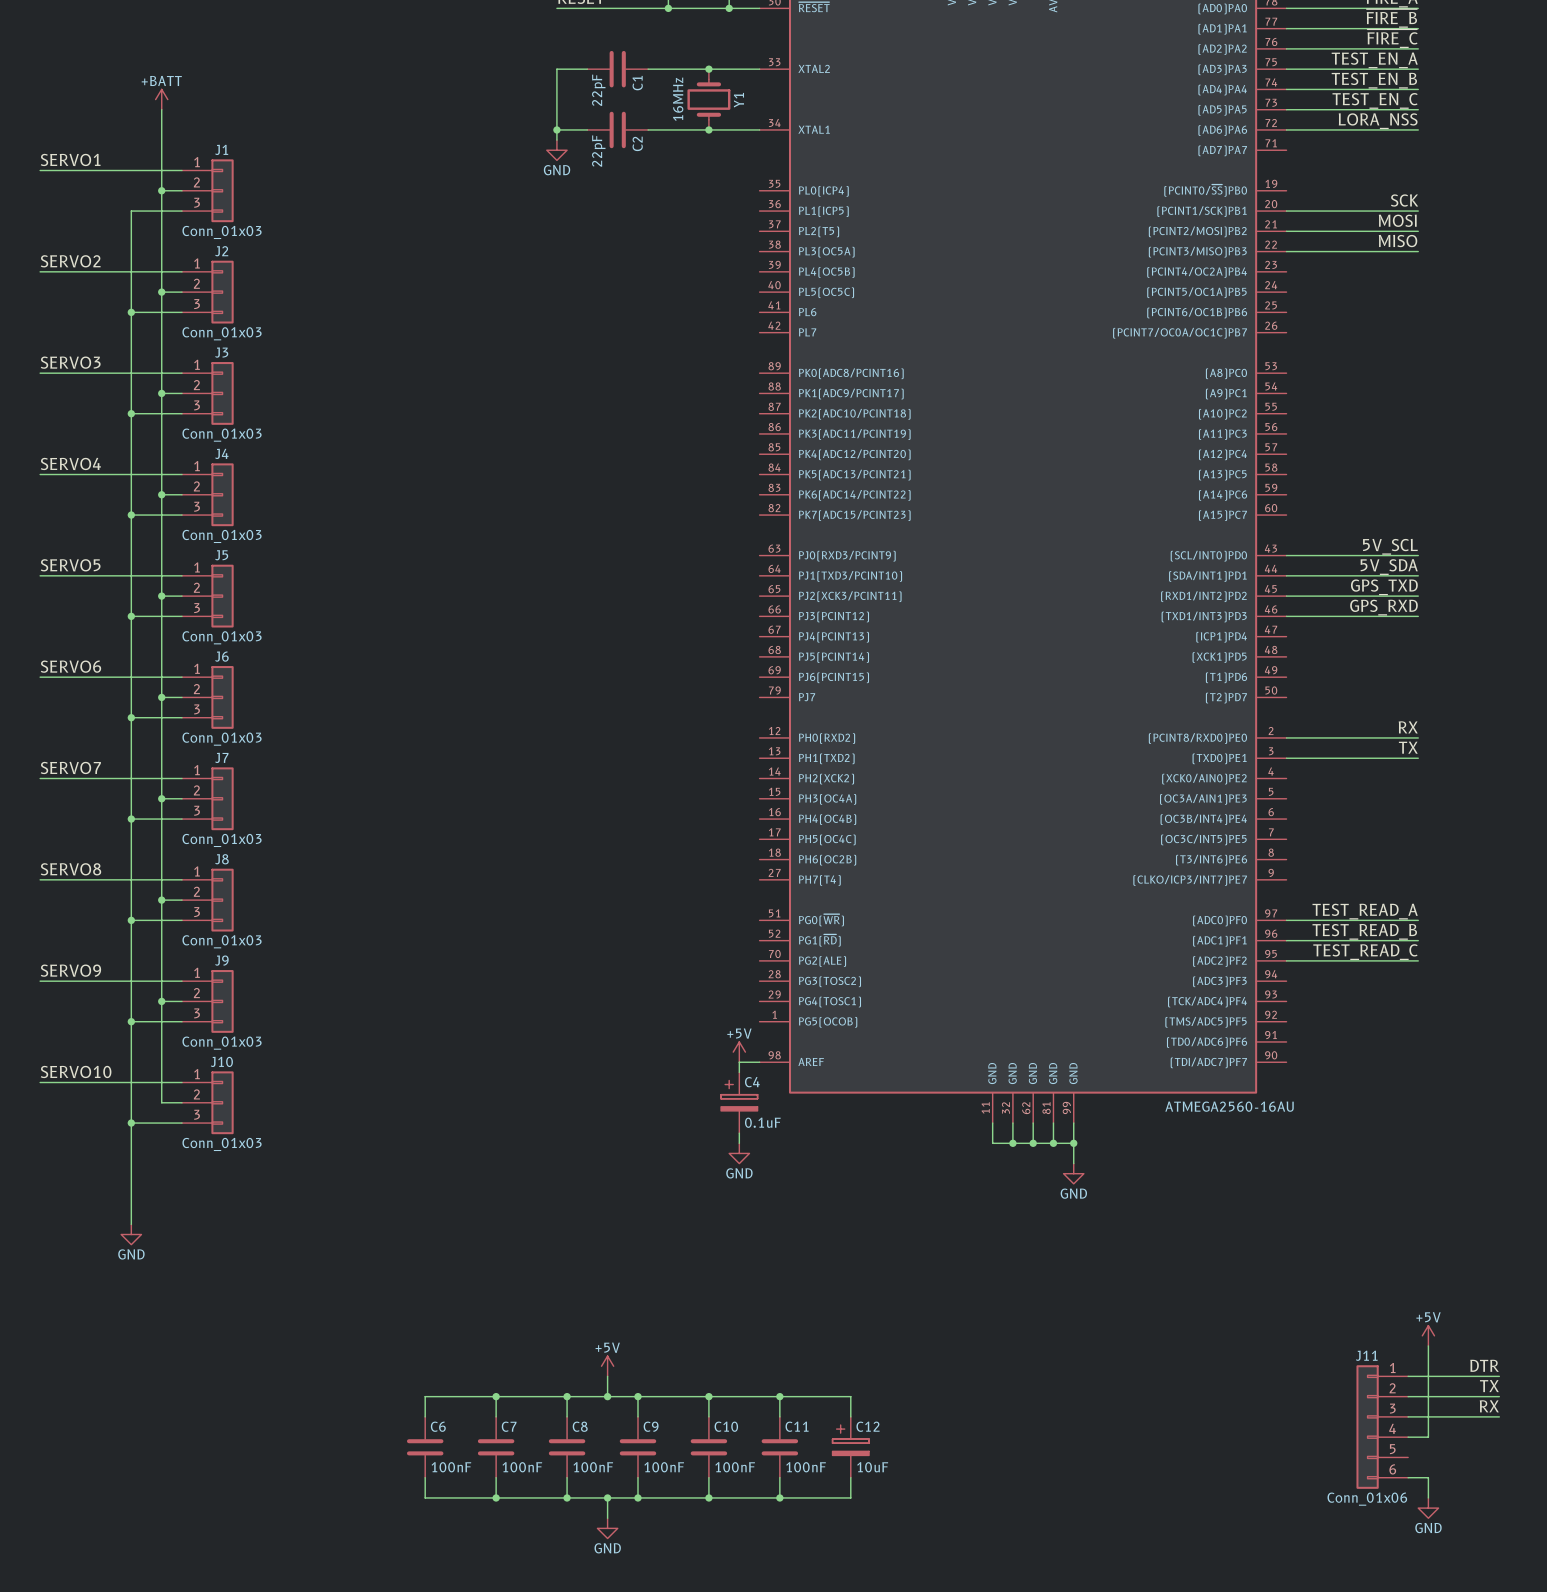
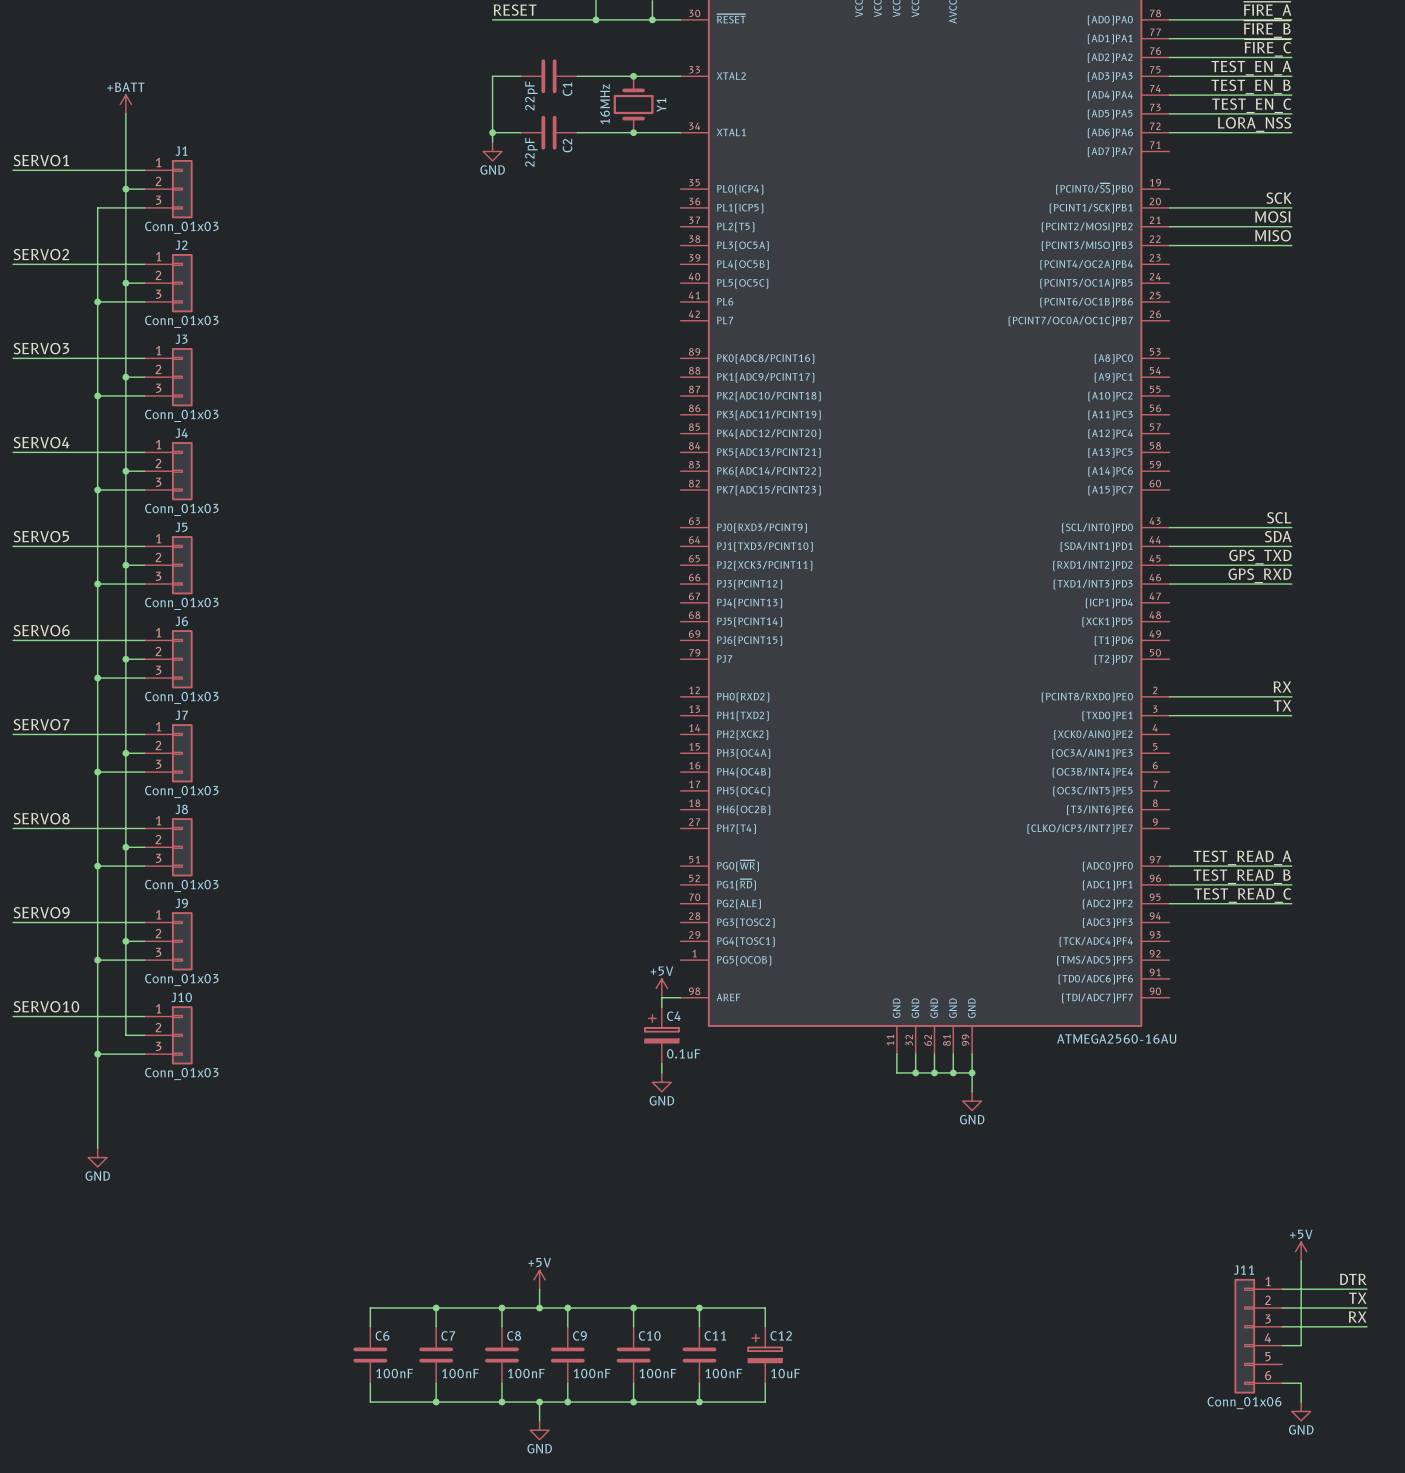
label: 5V_SCL (1390, 546) -> SCL (1279, 517)
label: 5V_SDA (1389, 567) -> SDA (1278, 536)

